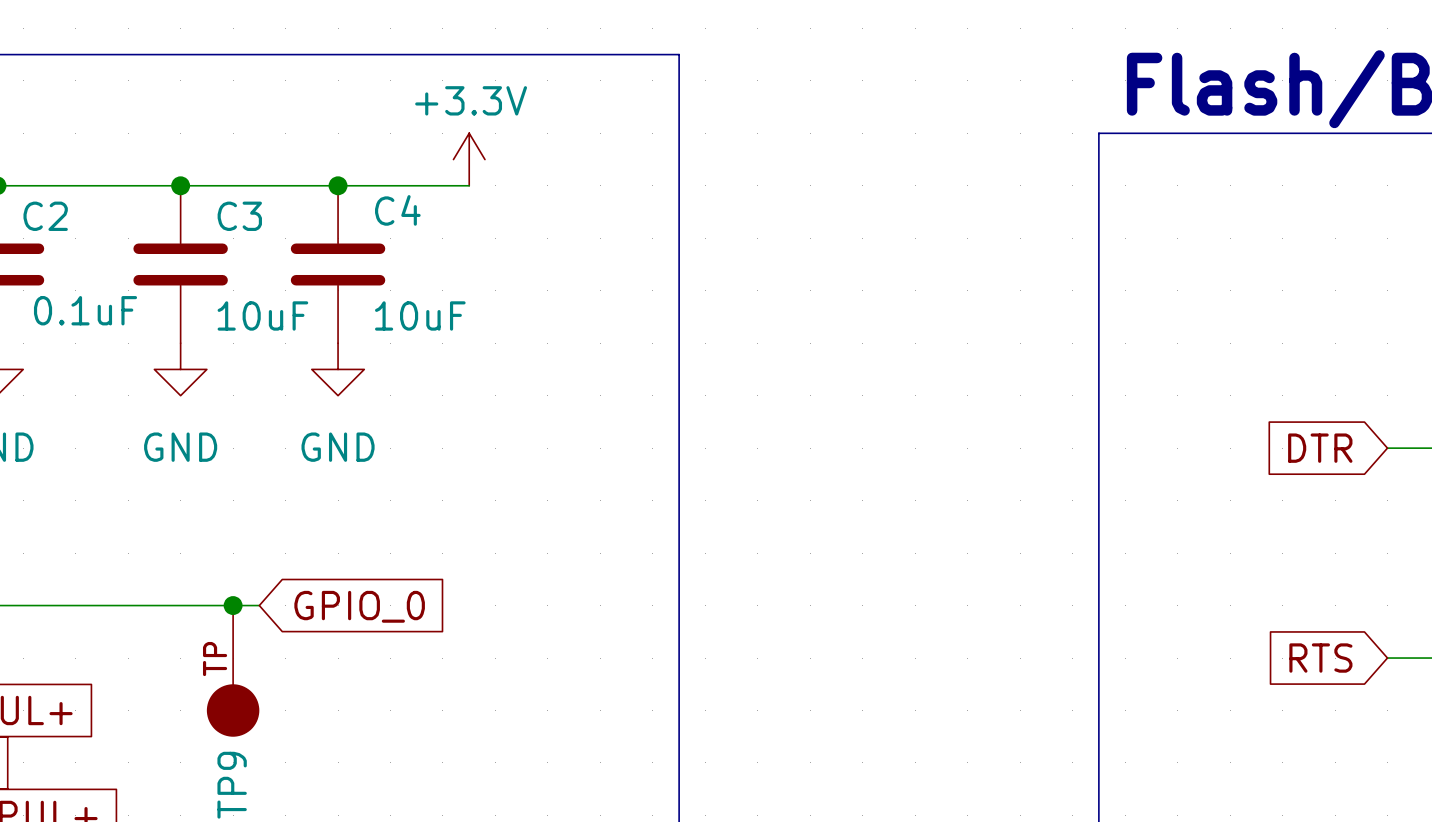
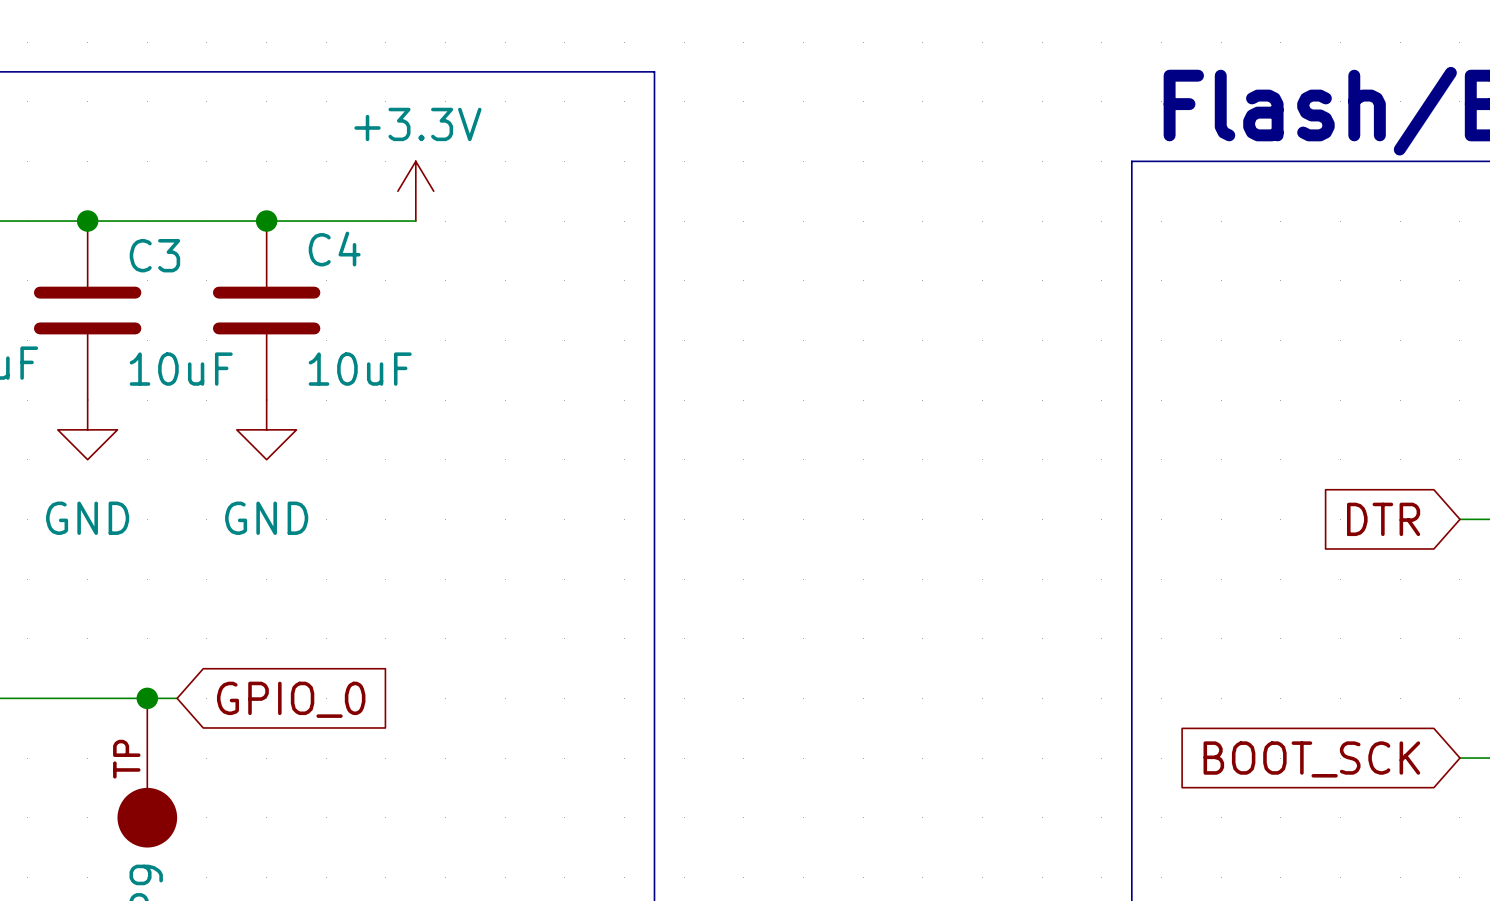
global label: RTS (1320, 658) -> BOOT_SCK (1311, 759)

